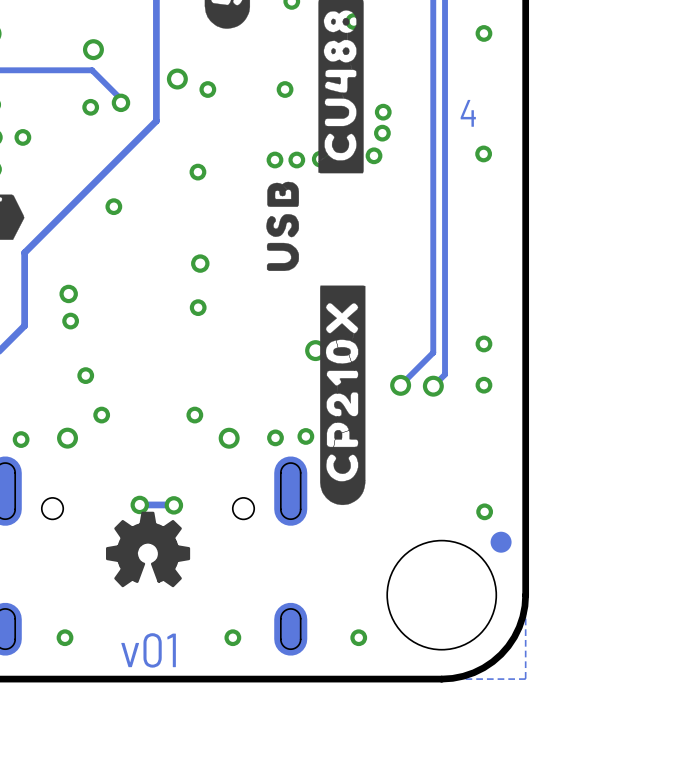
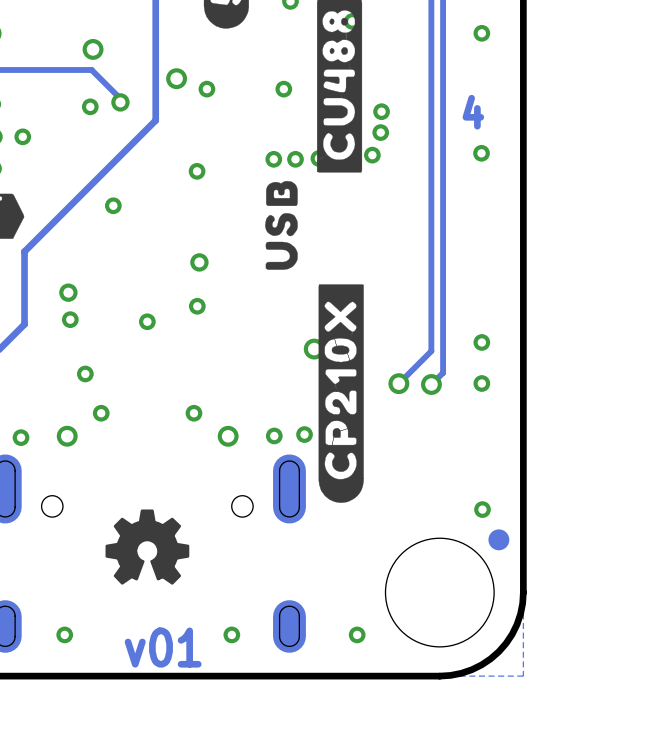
via: none -> (147, 321)
via: (139, 504) -> none
track: (173, 504) (139, 504) -> none
via: (173, 505) -> none

